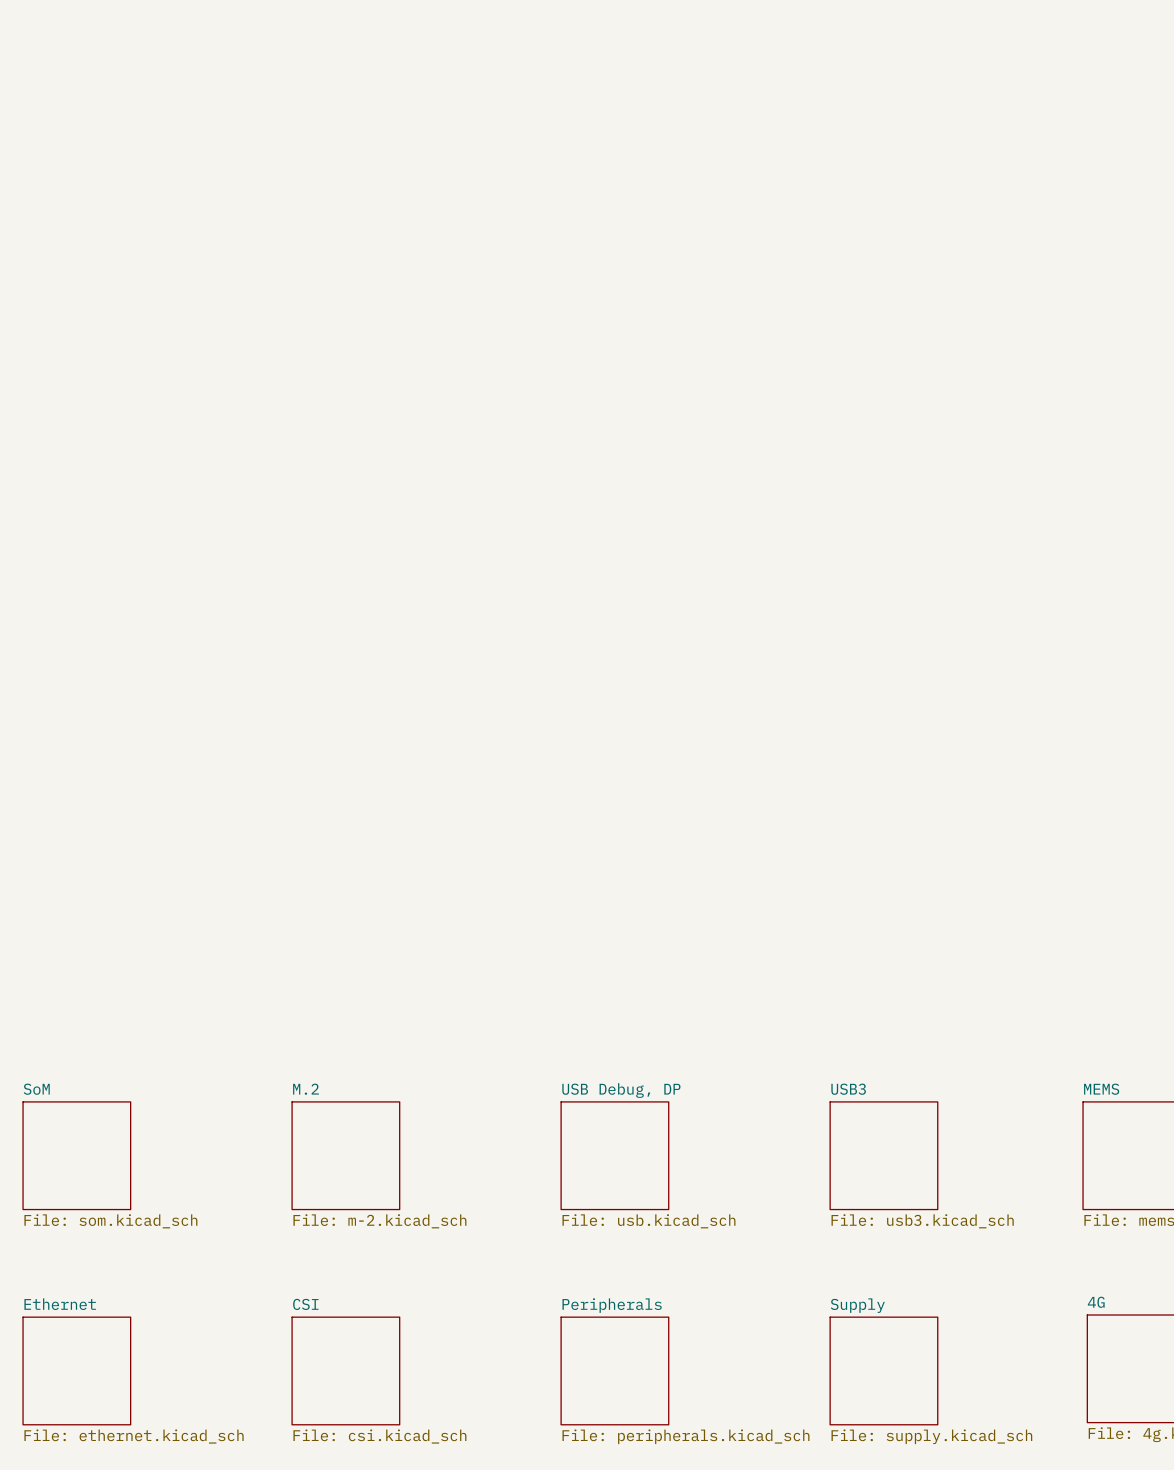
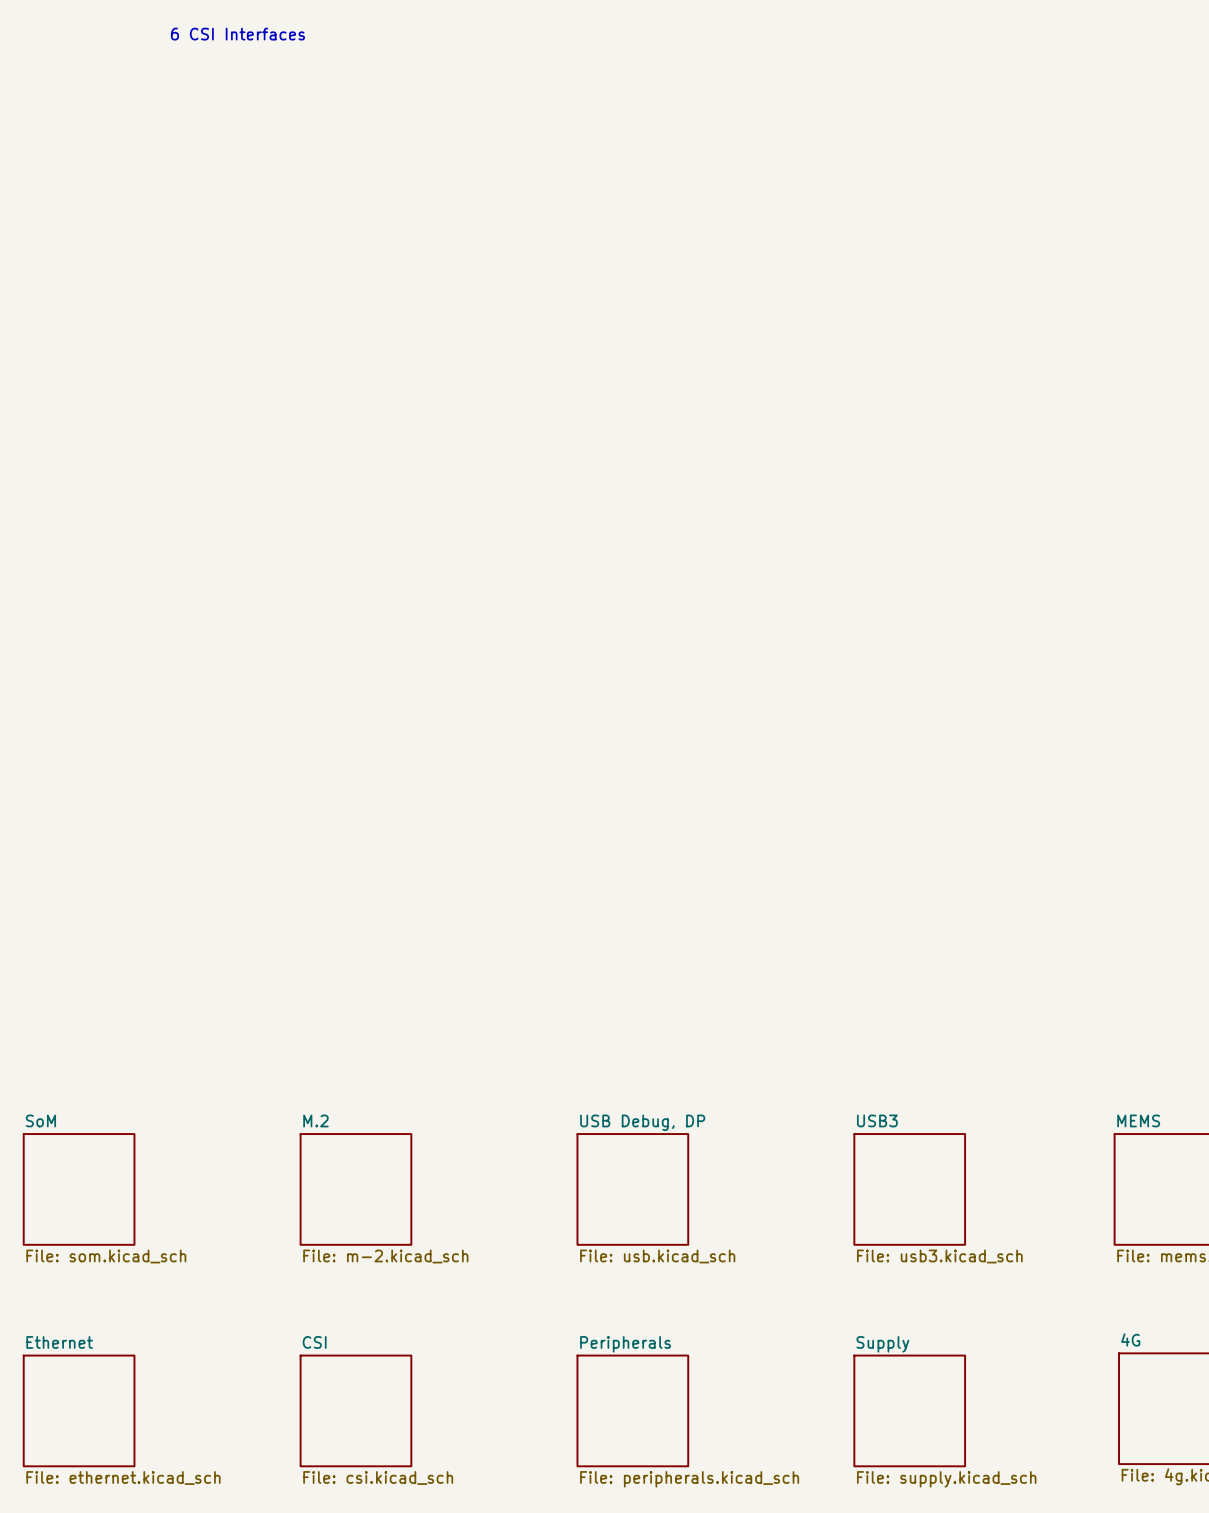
text: none -> 6 CSI Interfaces (237, 34)

